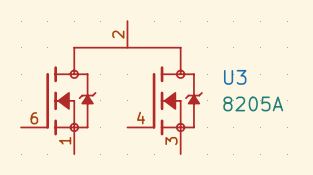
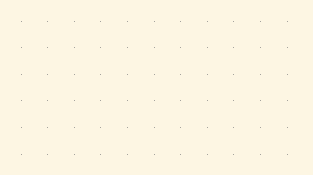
U3: 8205A (111, 87) -> none

